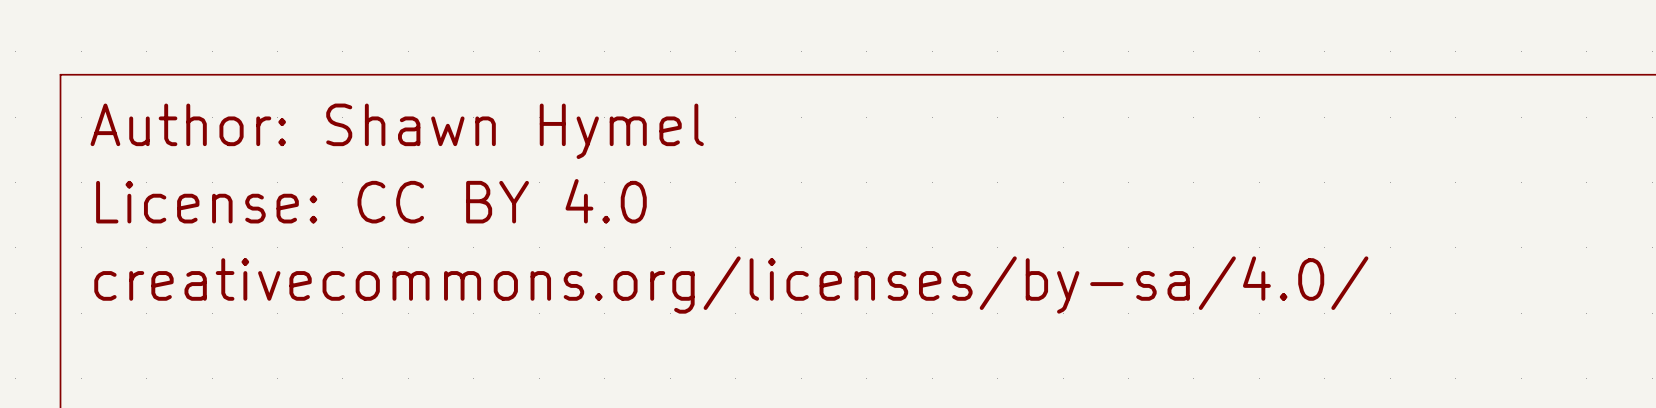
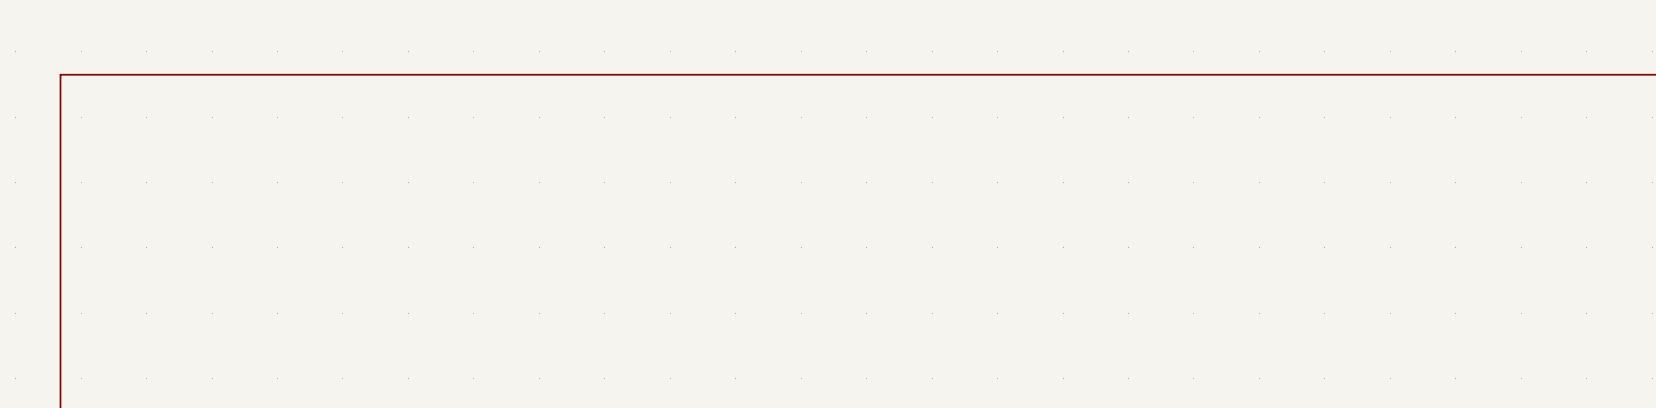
title block: Author: Shawn Hymel (397, 131) -> none
title block: License: CC BY 4.0 (371, 201) -> none
title block: creativecommons.org/licenses/by-sa/4.0/ (731, 285) -> none

